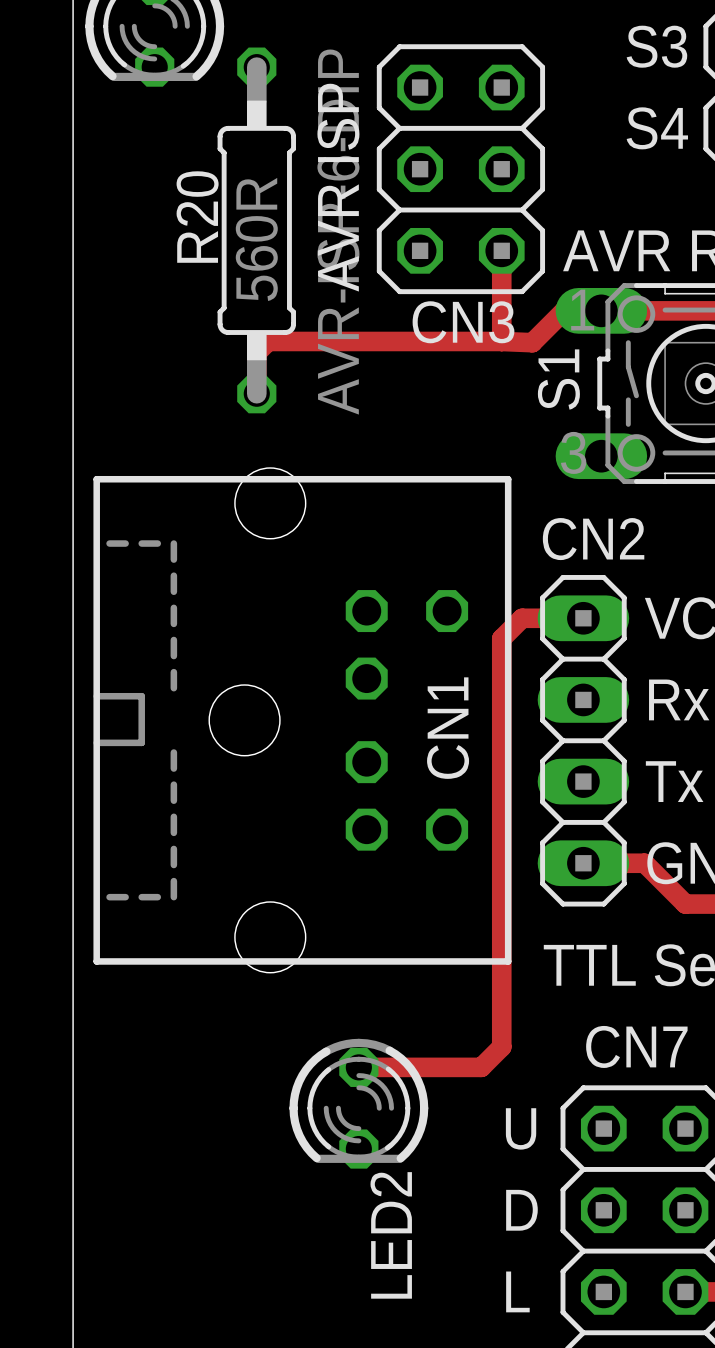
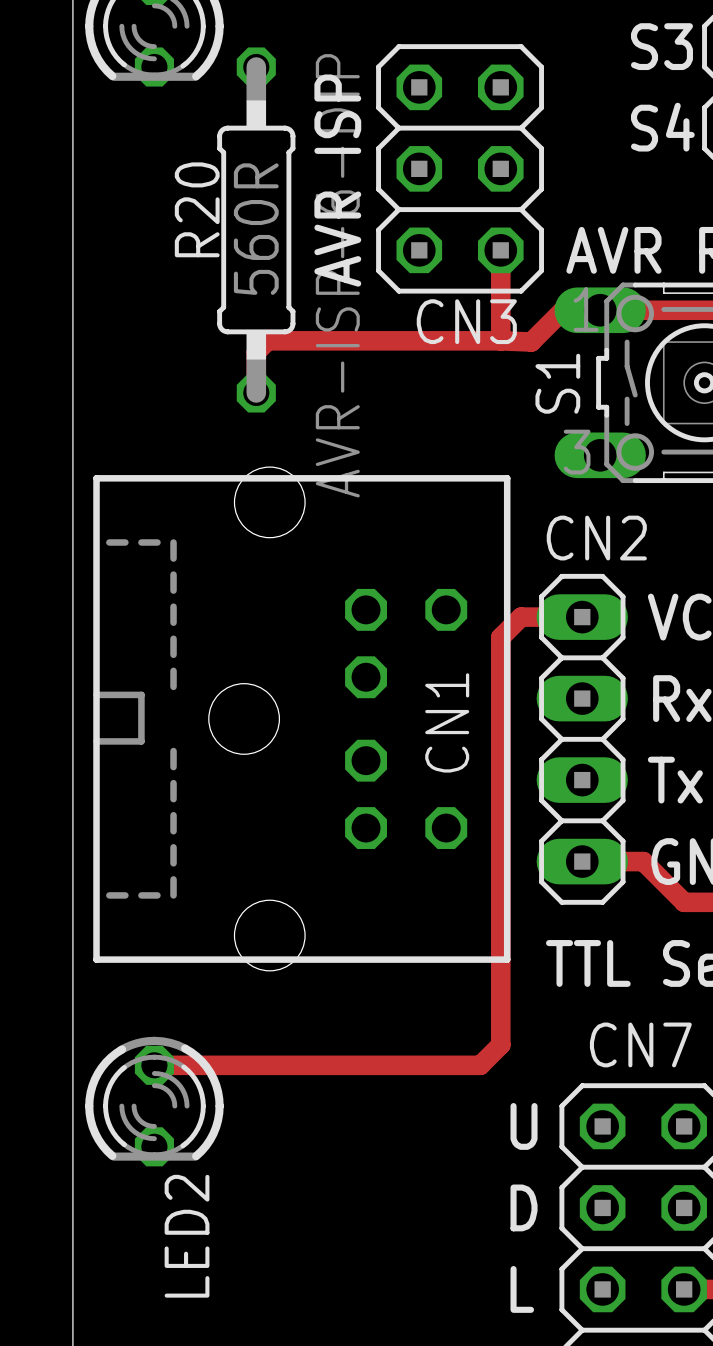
track: none -> (154, 1065) (358, 1065)
LED2 position: (358, 1103) -> (154, 1101)

